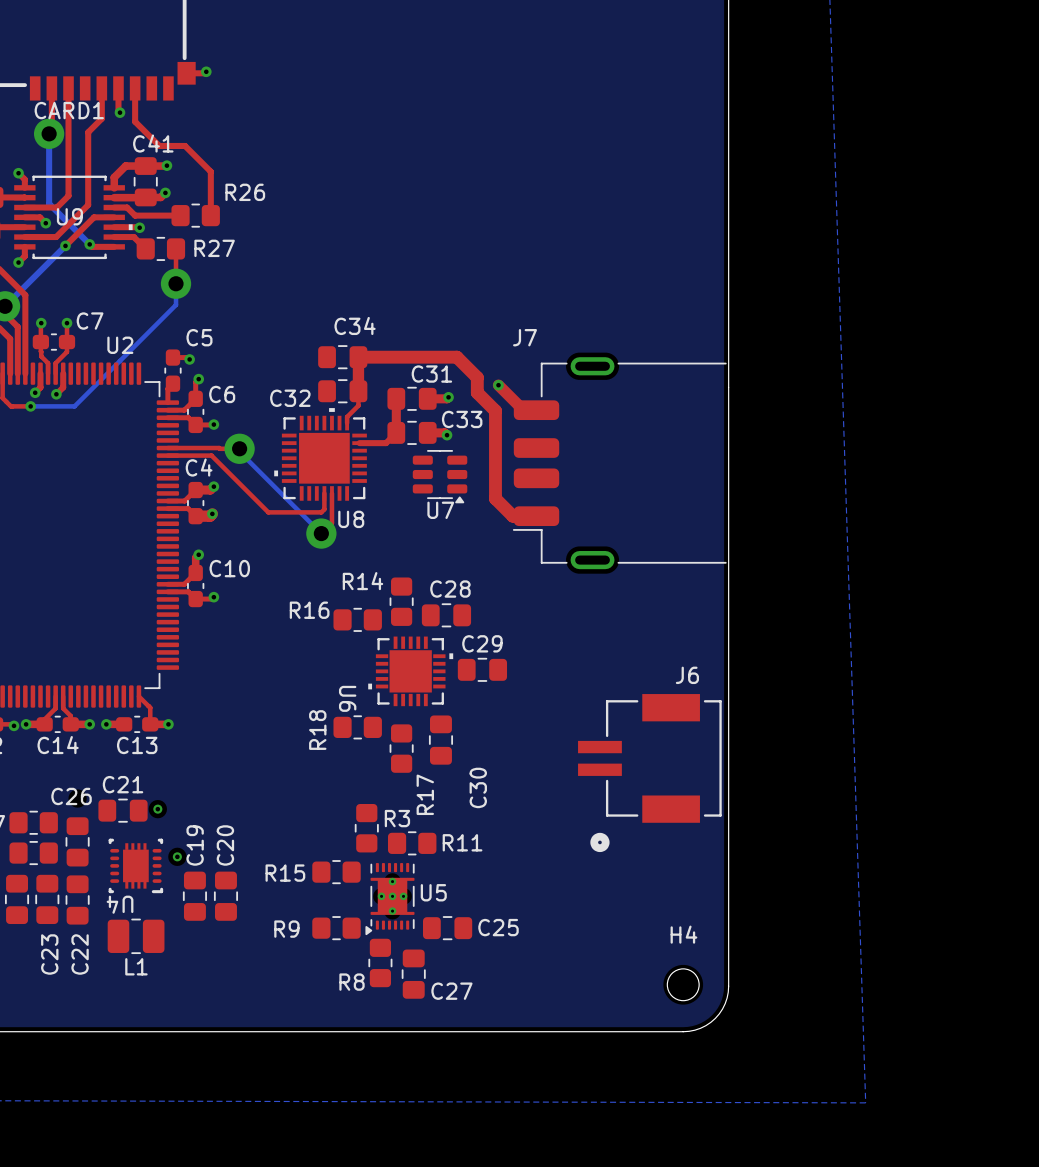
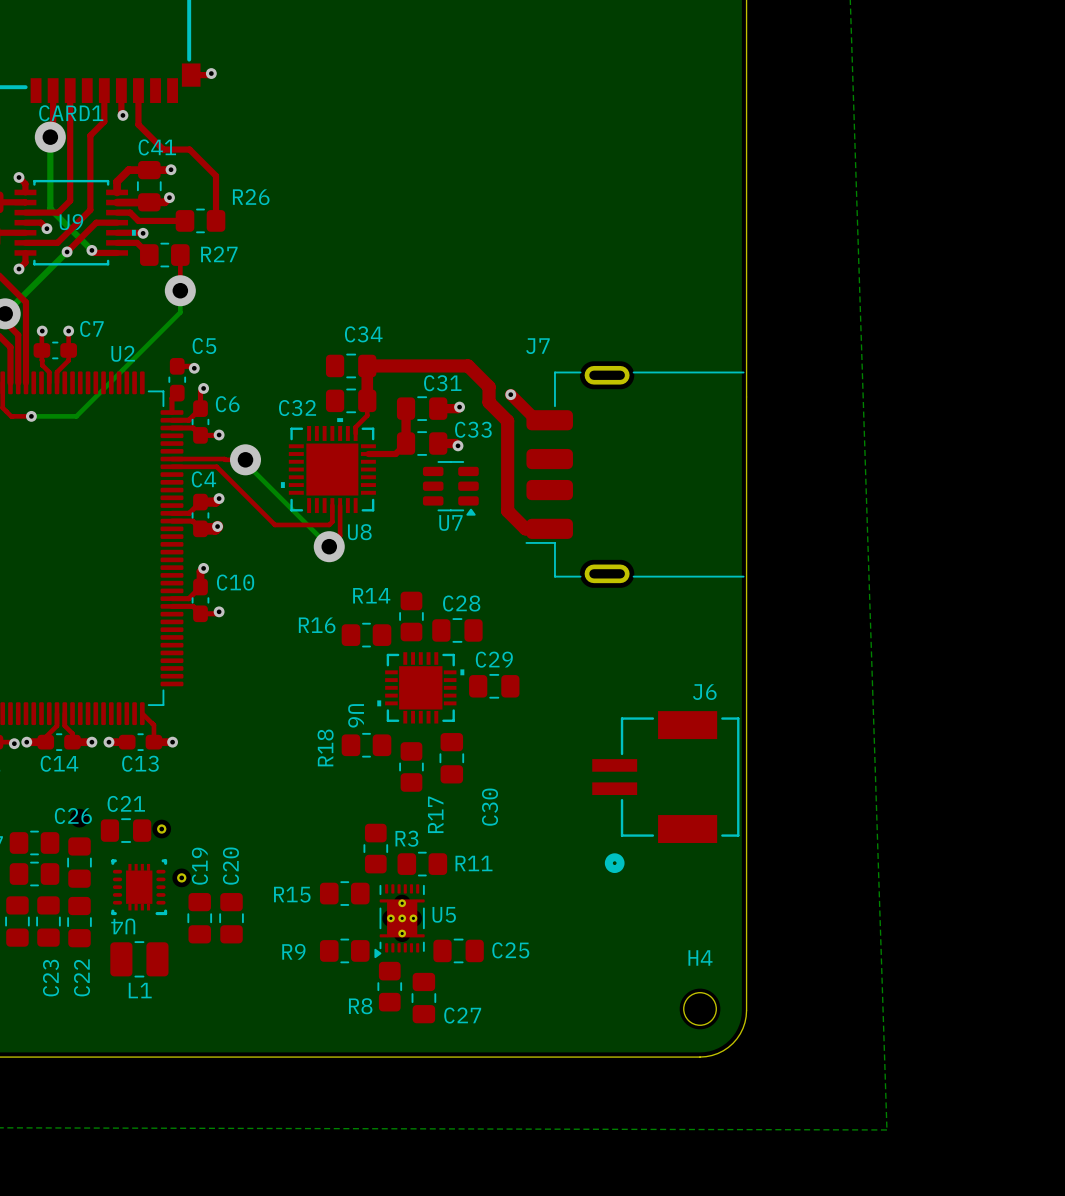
top track: (40, 373) (40, 387) (35, 392) -> none
top track: (63, 373) (63, 387) (56, 394) -> none
via: (35, 392) -> none
via: (56, 394) -> none

